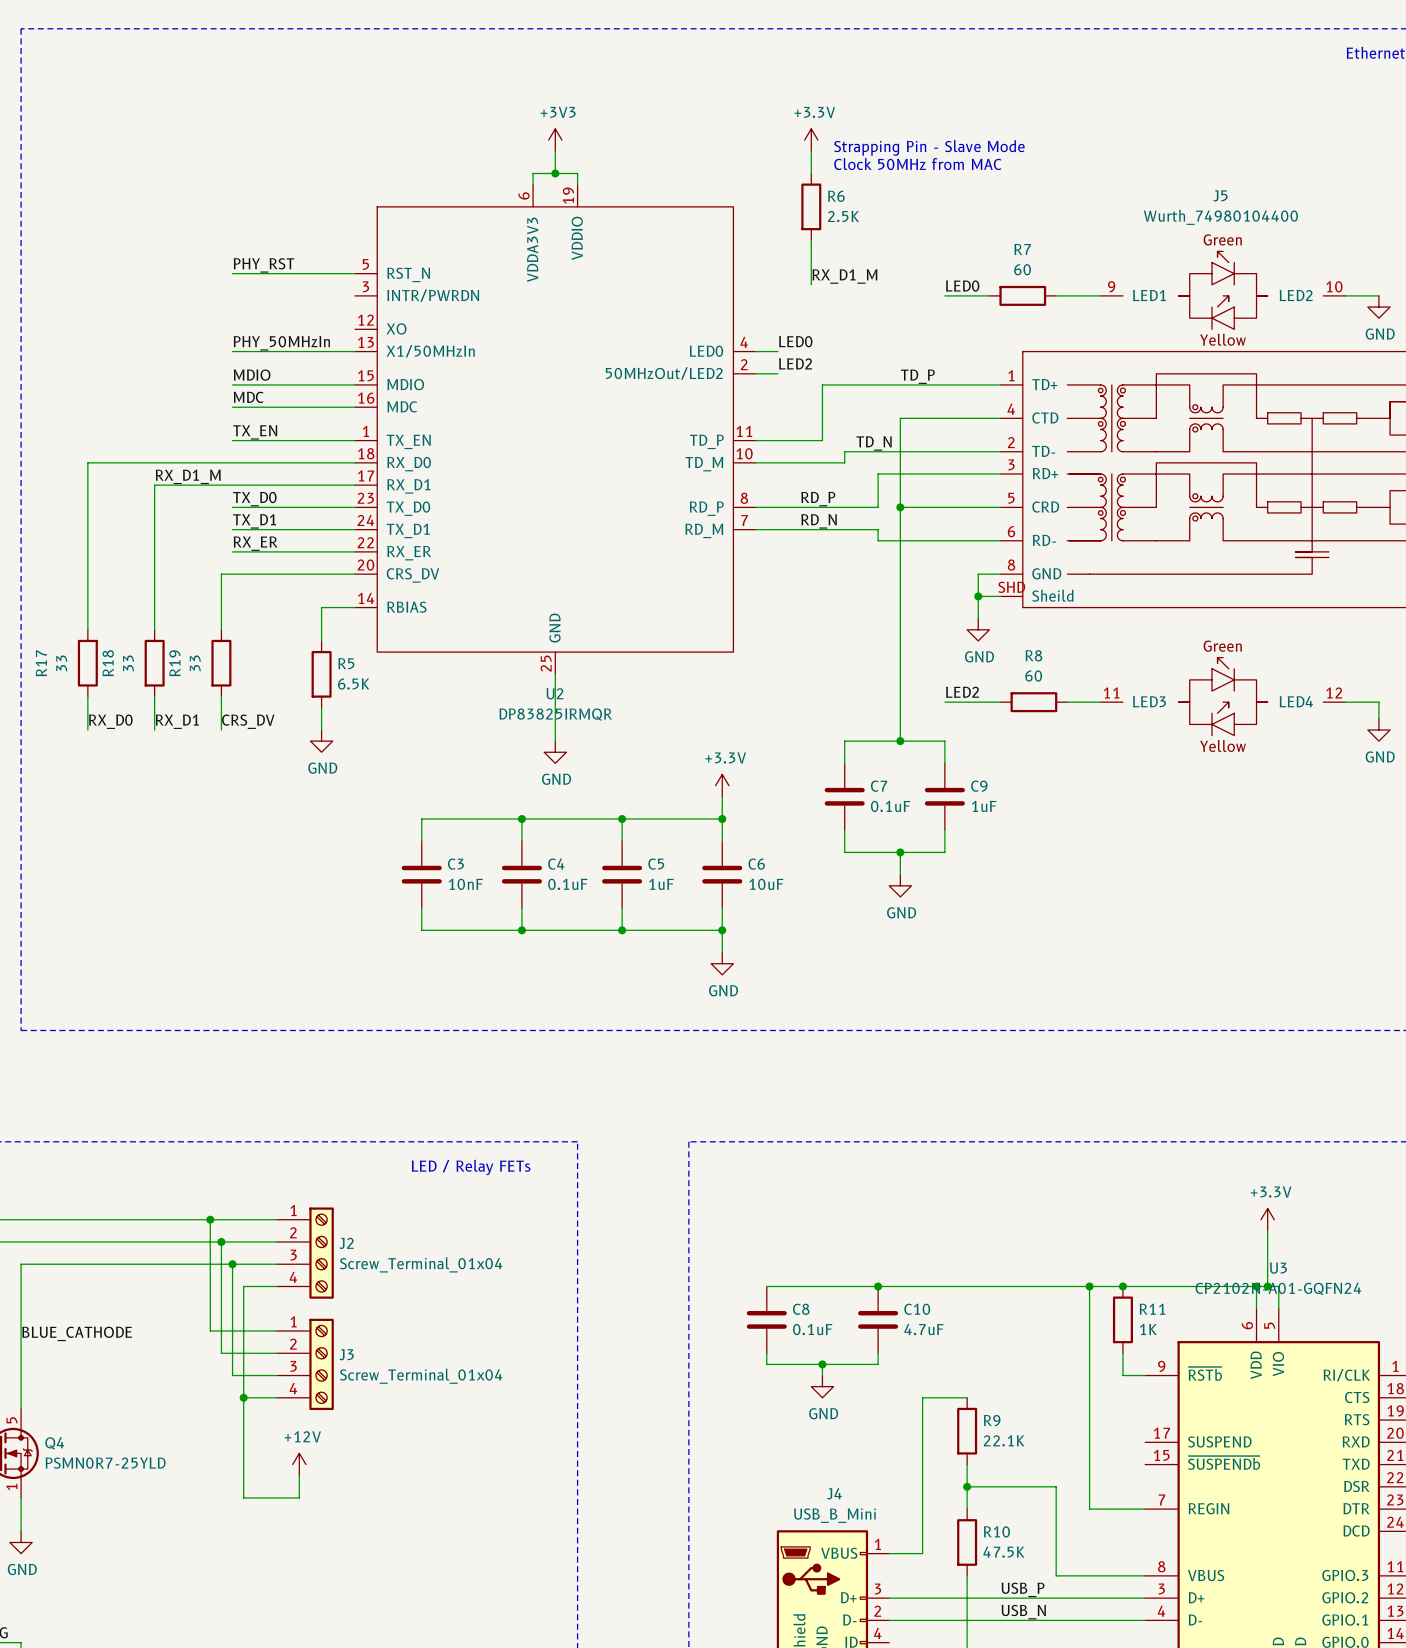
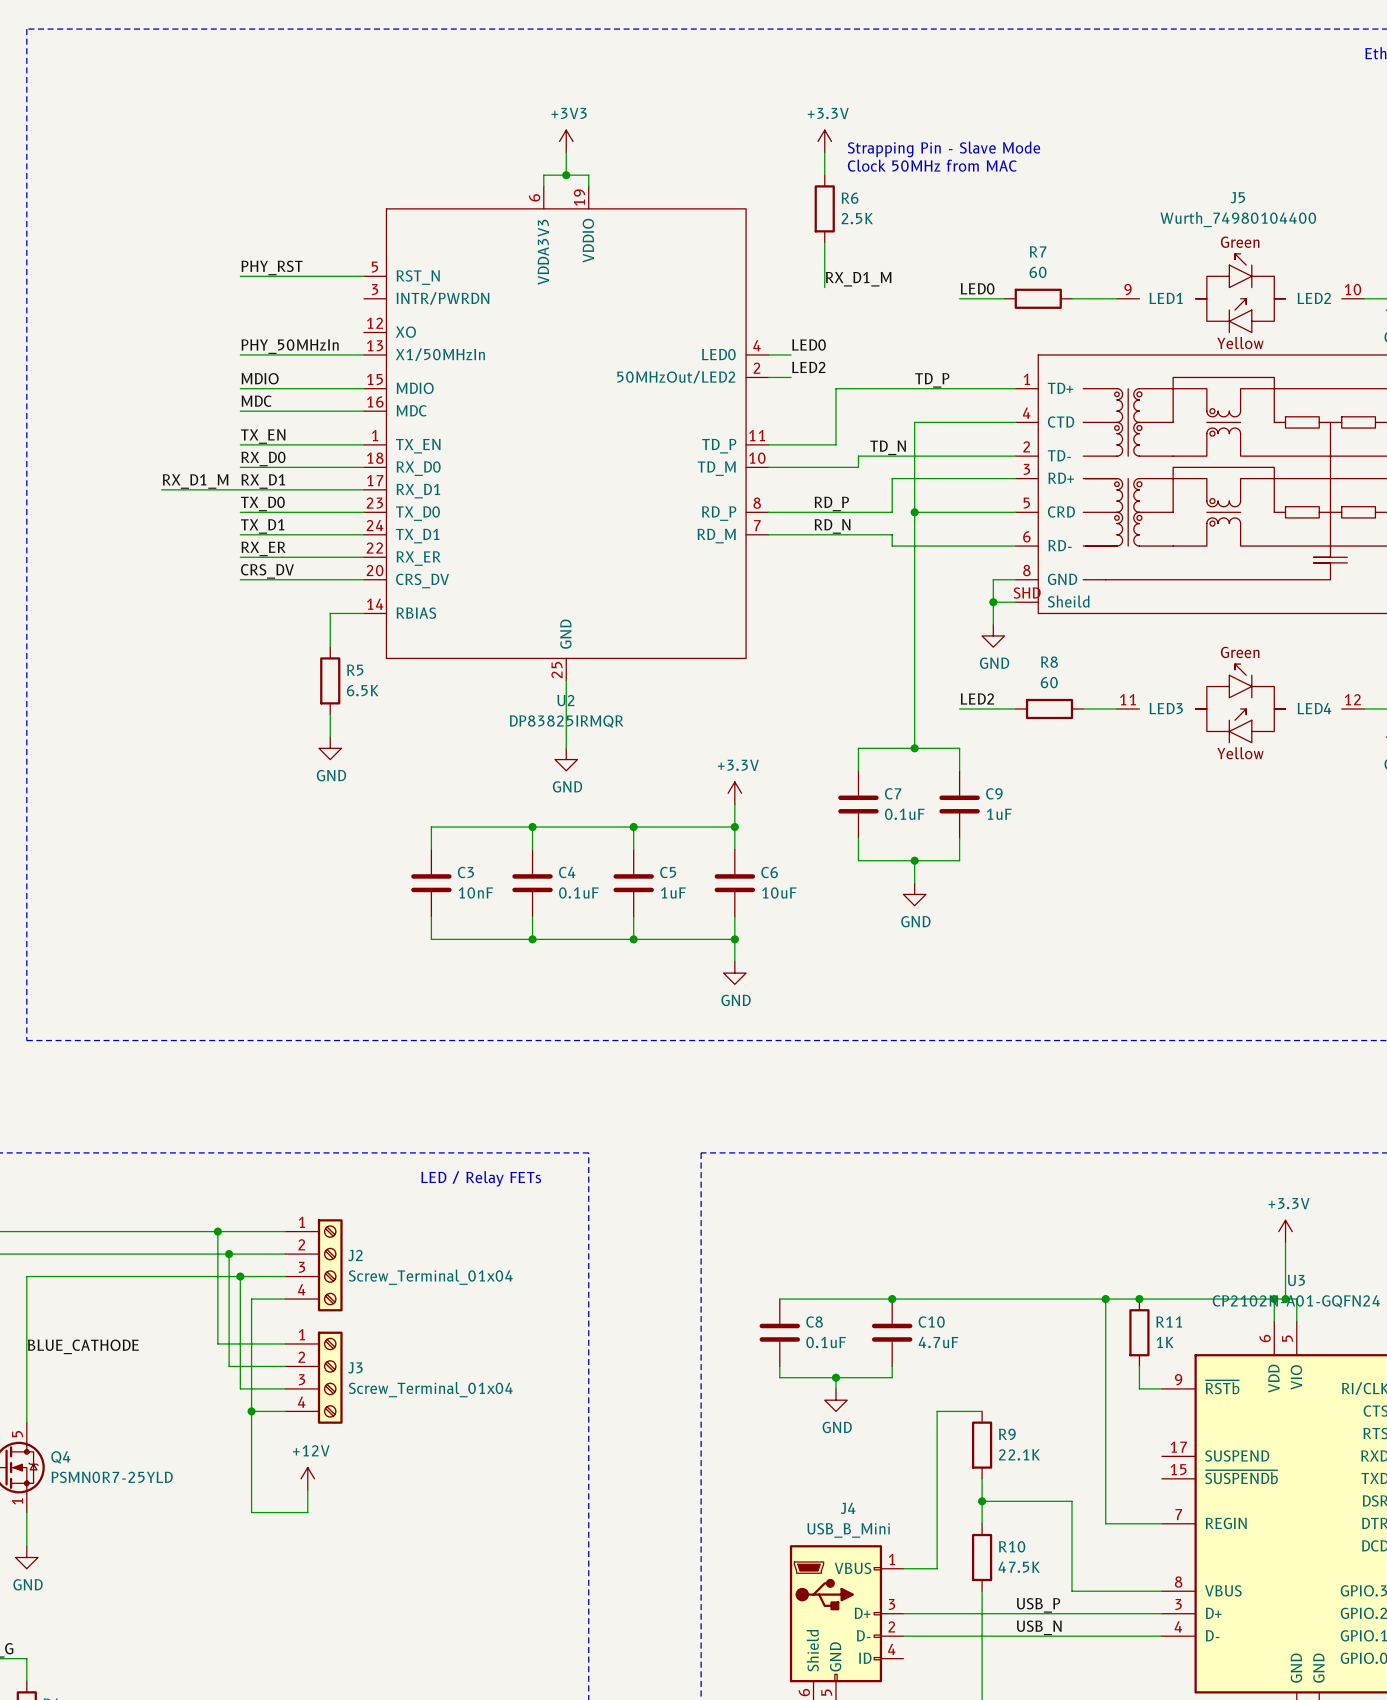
label: none -> RX_D0 (263, 459)
wire: (232, 462) (87, 462) (87, 629) -> none
label: none -> RX_D1 (263, 481)
wire: (154, 485) (154, 629) -> none
wire: (232, 574) (221, 574) (221, 629) -> none
R17: 33 (87, 663) -> none
R18: 33 (154, 663) -> none
R19: 33 (221, 663) -> none
wire: (87, 696) (87, 729) -> none
wire: (154, 696) (154, 729) -> none
wire: (221, 696) (221, 729) -> none
label: RX_D0 (110, 721) -> none
label: RX_D1 (177, 721) -> none
label position: CRS_DV (248, 721) -> CRS_DV (267, 571)

